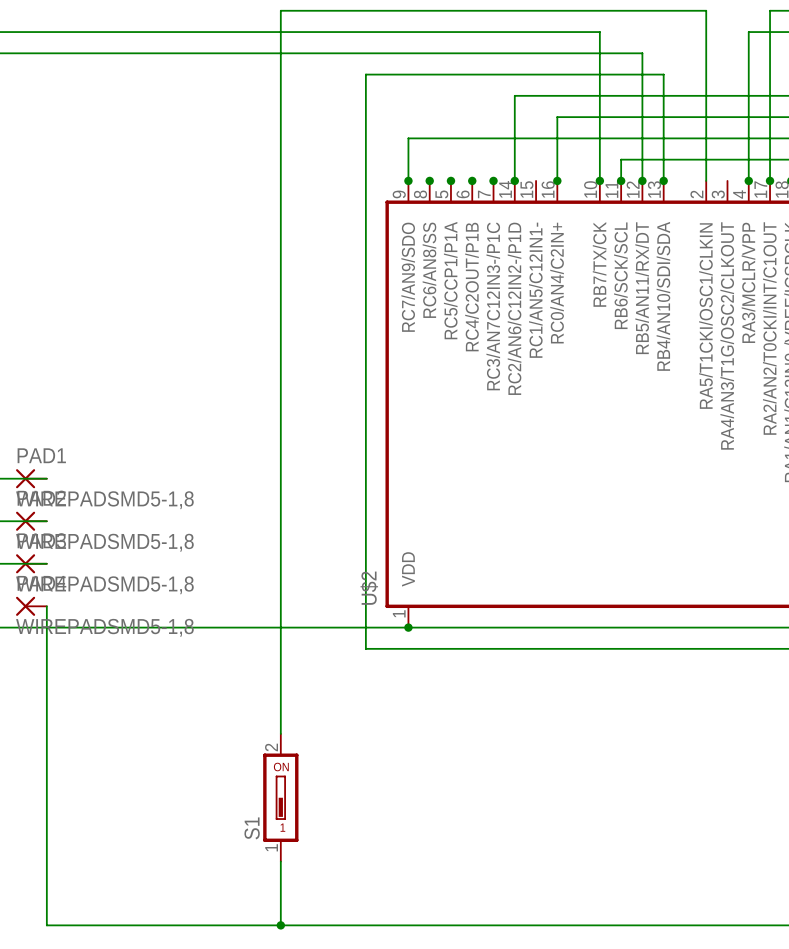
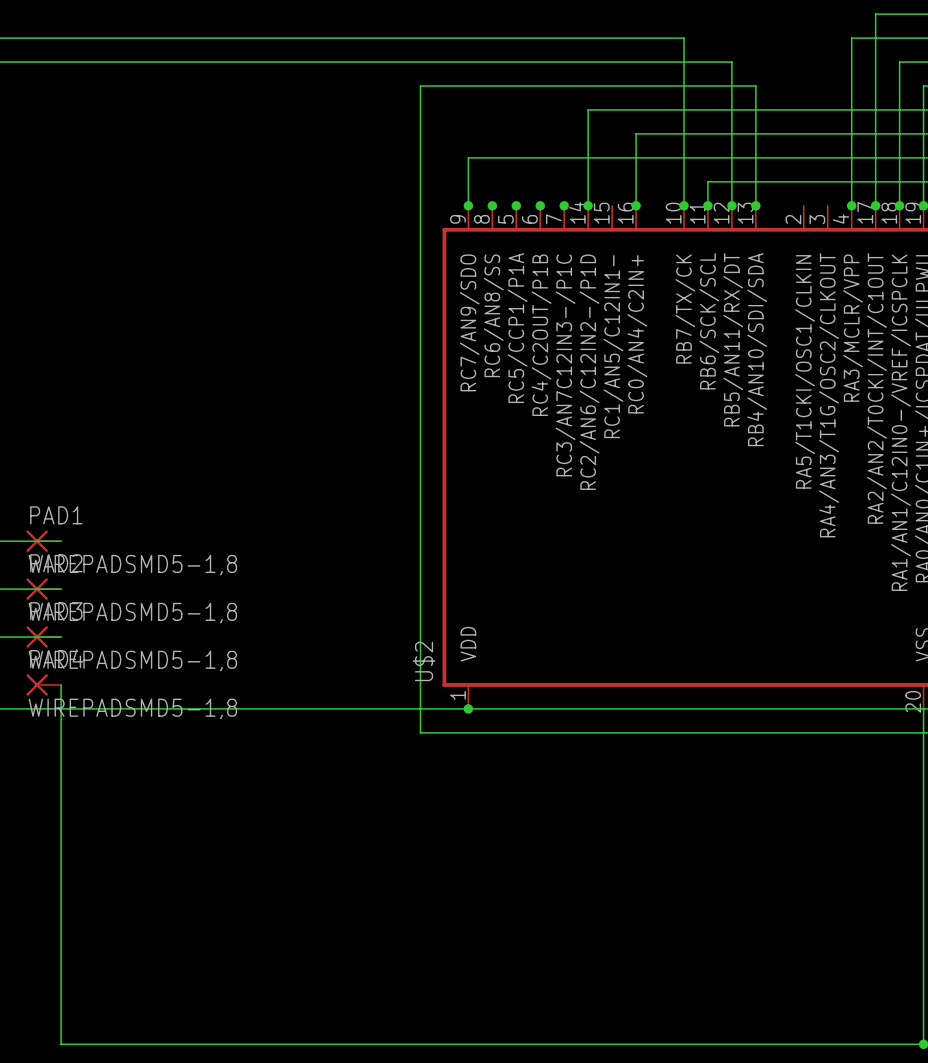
wire: (706, 180) (706, 10) (280, 10) (280, 733) -> none
S1: (280, 797) -> none
wire: (280, 861) (280, 925) -> none
junction: (280, 925) -> none

